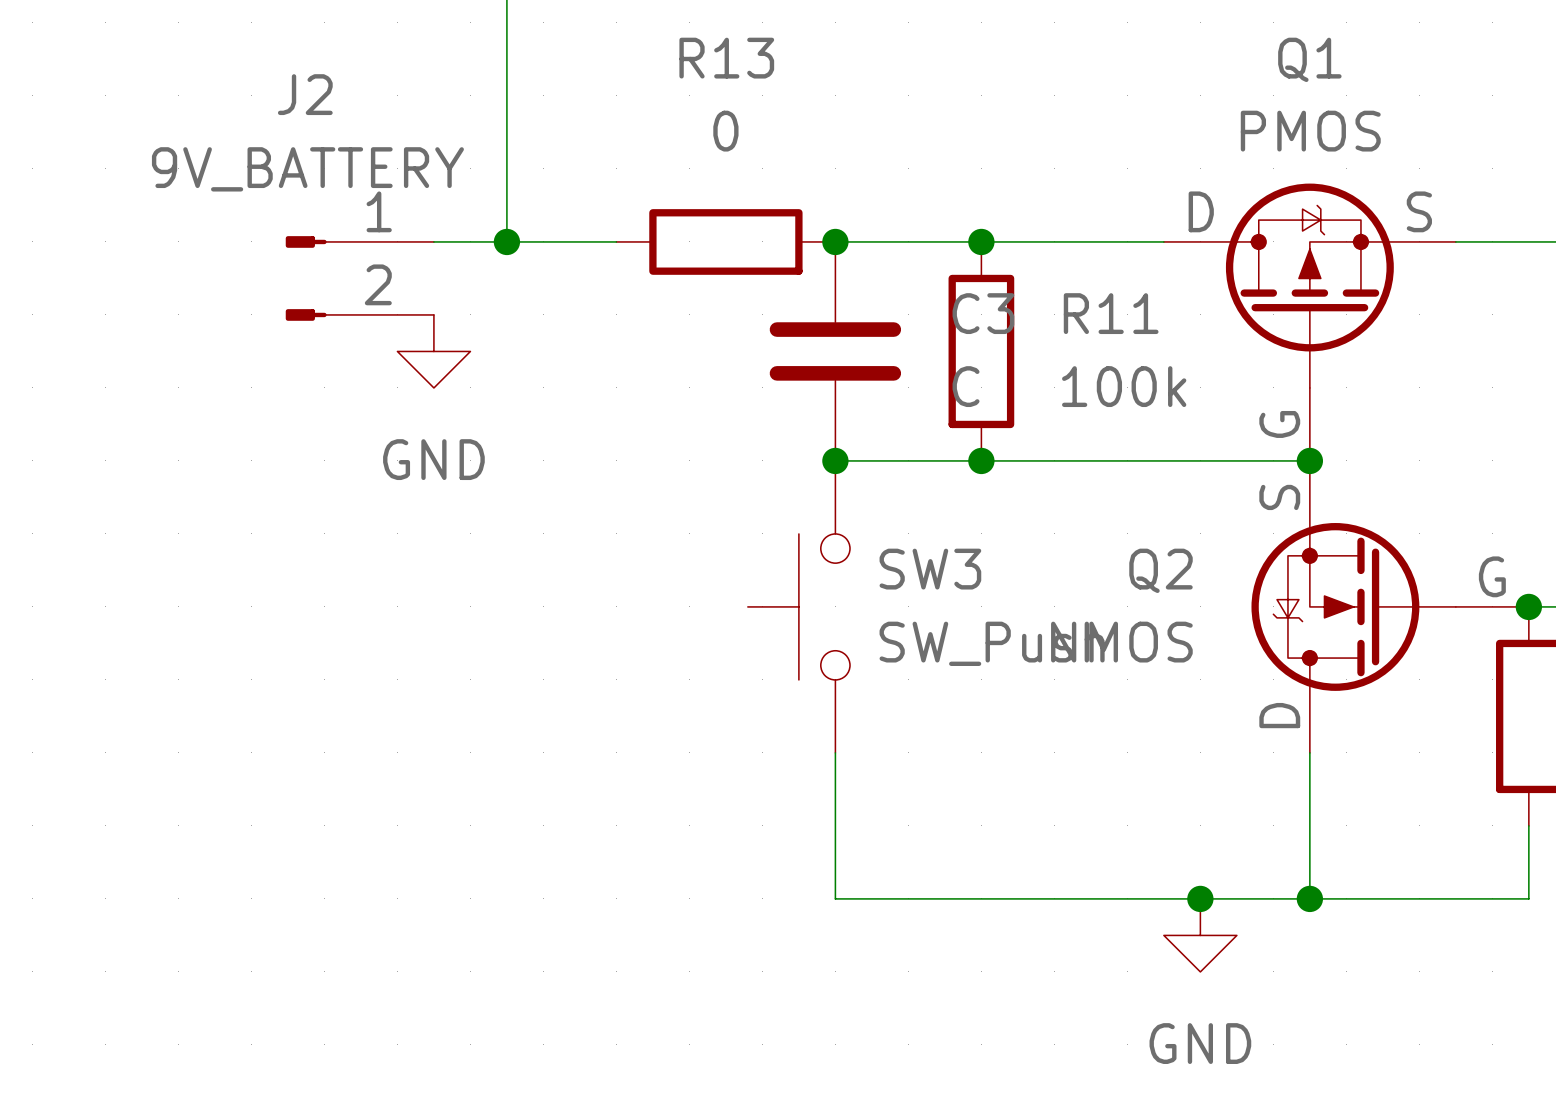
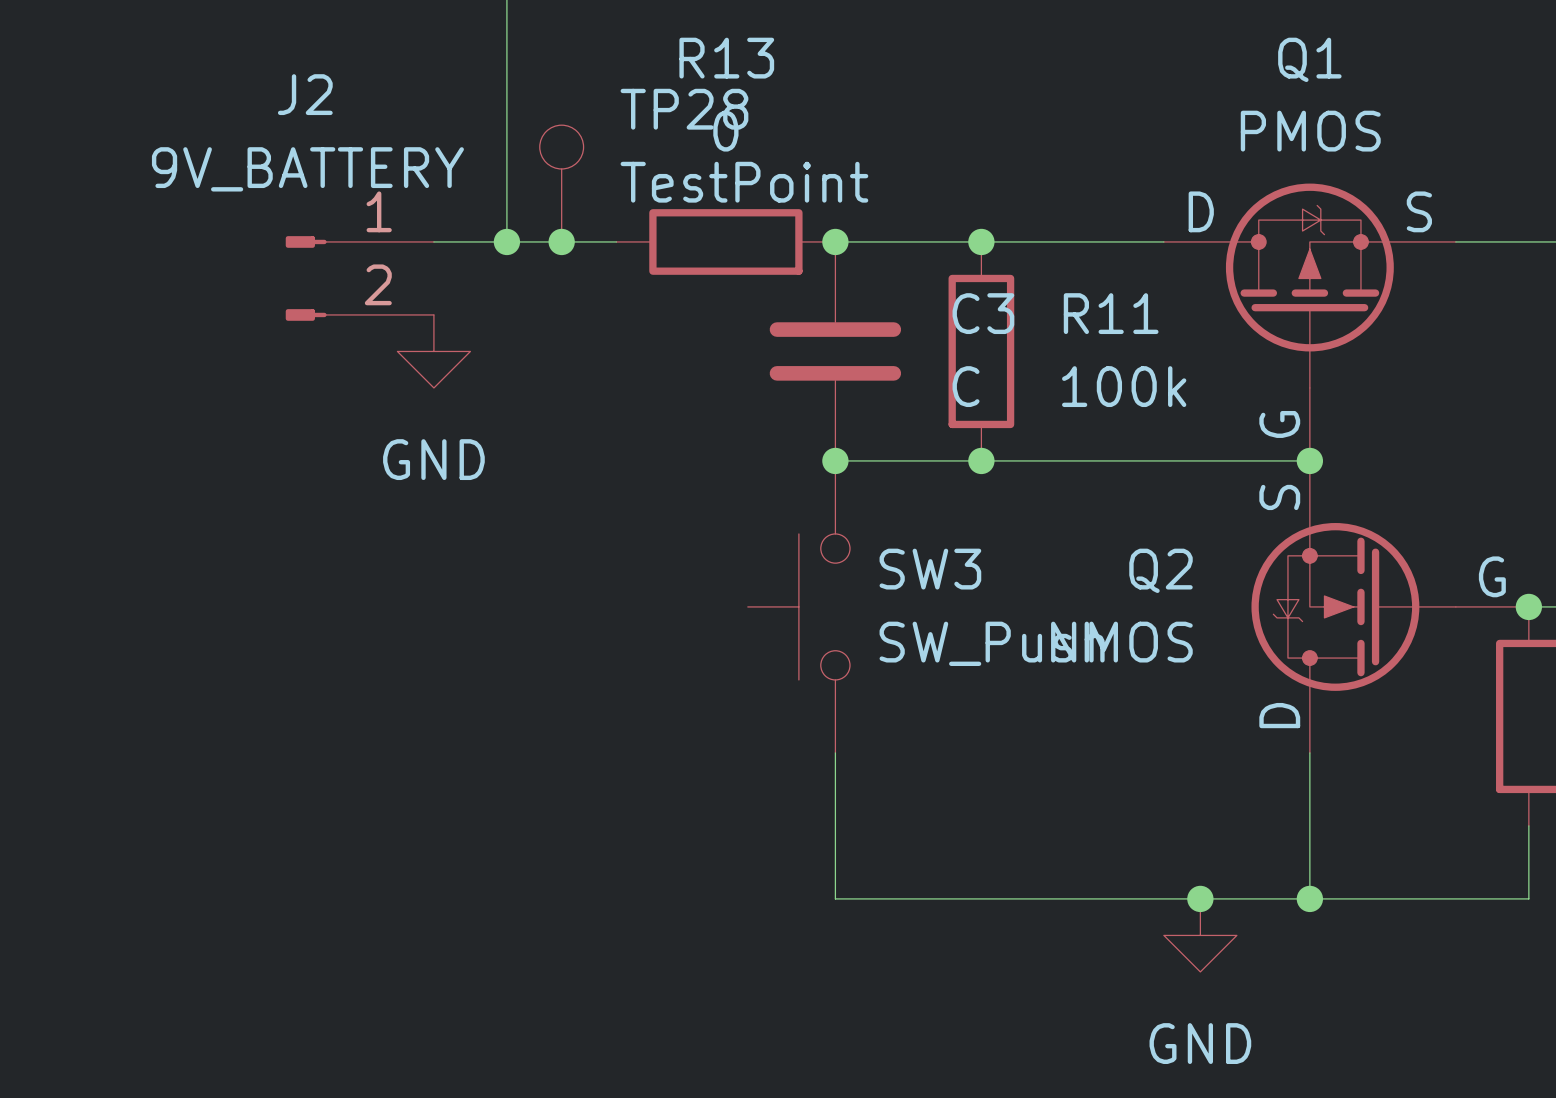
TP28: none -> TestPoint (561, 183)
junction: none -> (561, 241)

